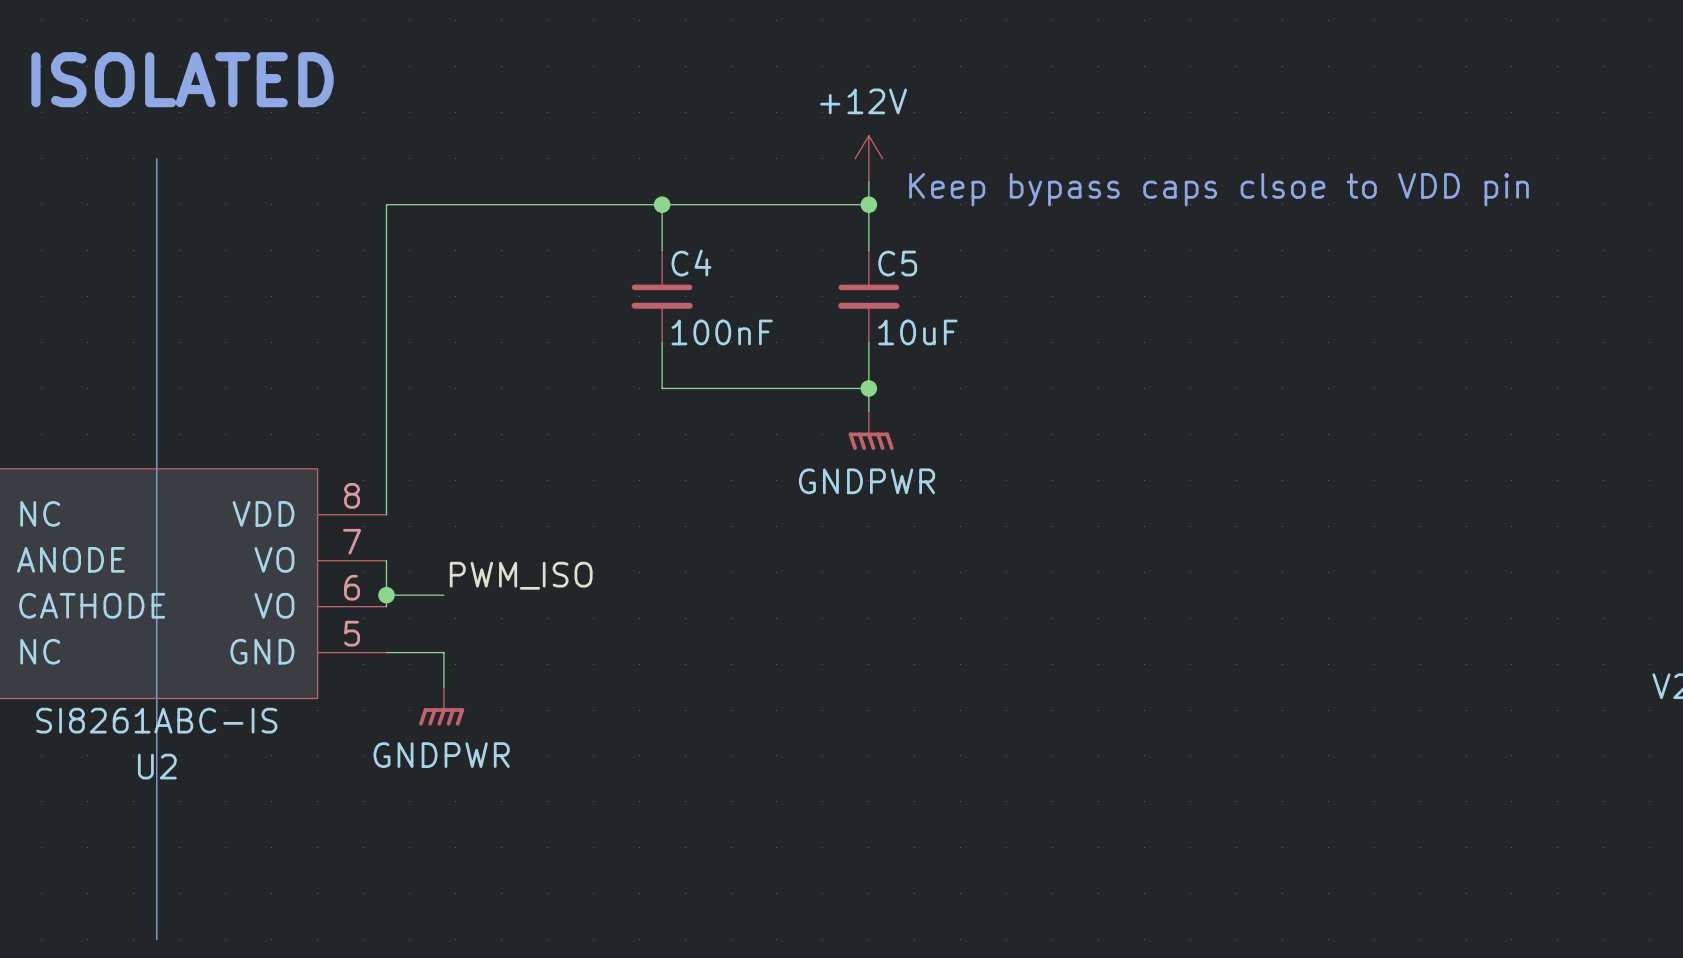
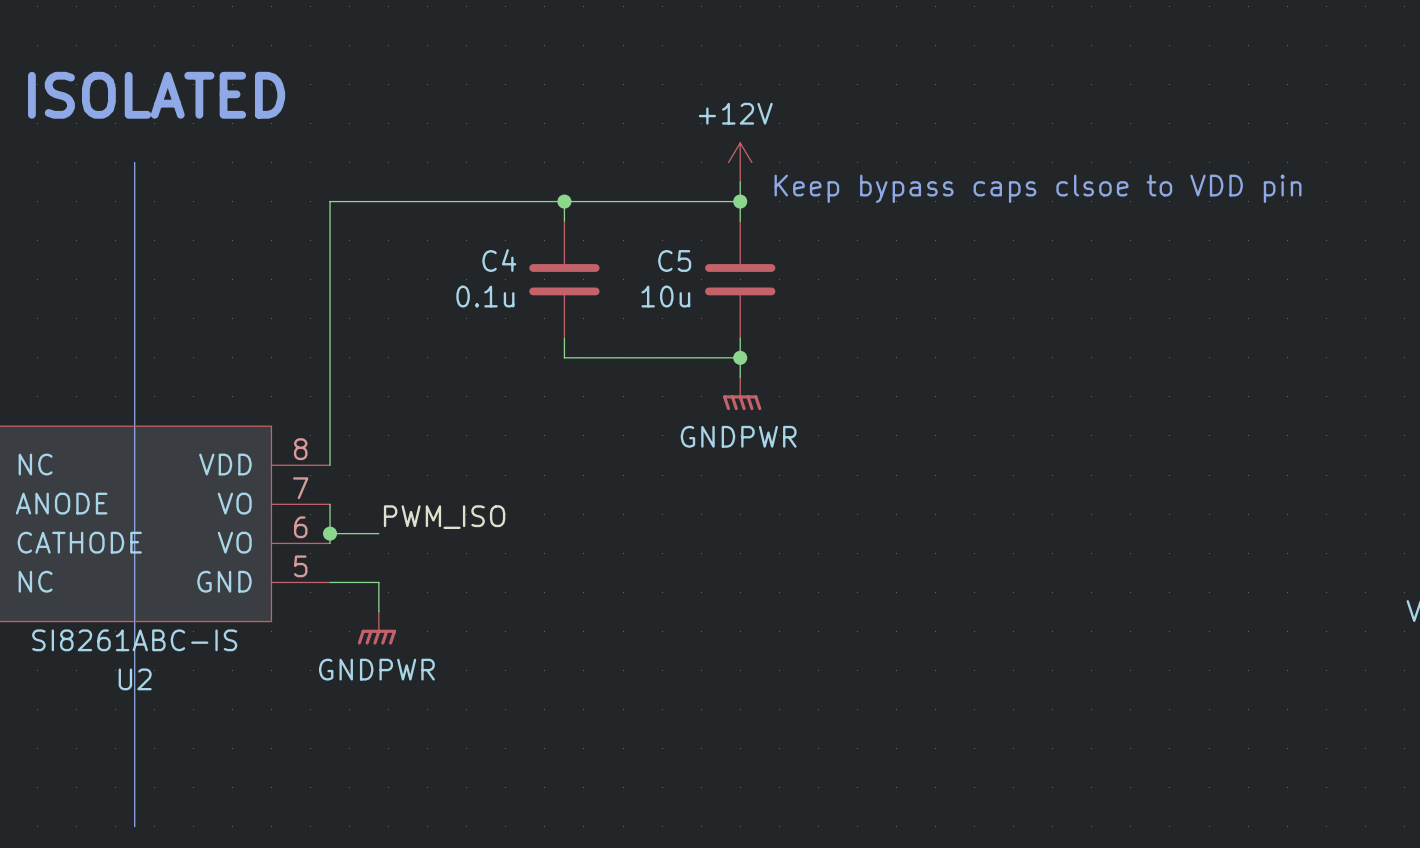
C4 symbol: [631, 250, 693, 343] -> [529, 221, 600, 339]
C5 symbol: [838, 250, 900, 343] -> [705, 221, 776, 339]
C4 name position: C4 (691, 263) -> C4 (499, 260)
C5 name position: C5 (897, 263) -> C5 (674, 261)
C4 value: 100nF (722, 332) -> 0.1u (485, 296)
C5 value: 10uF (917, 332) -> 10u (665, 296)

